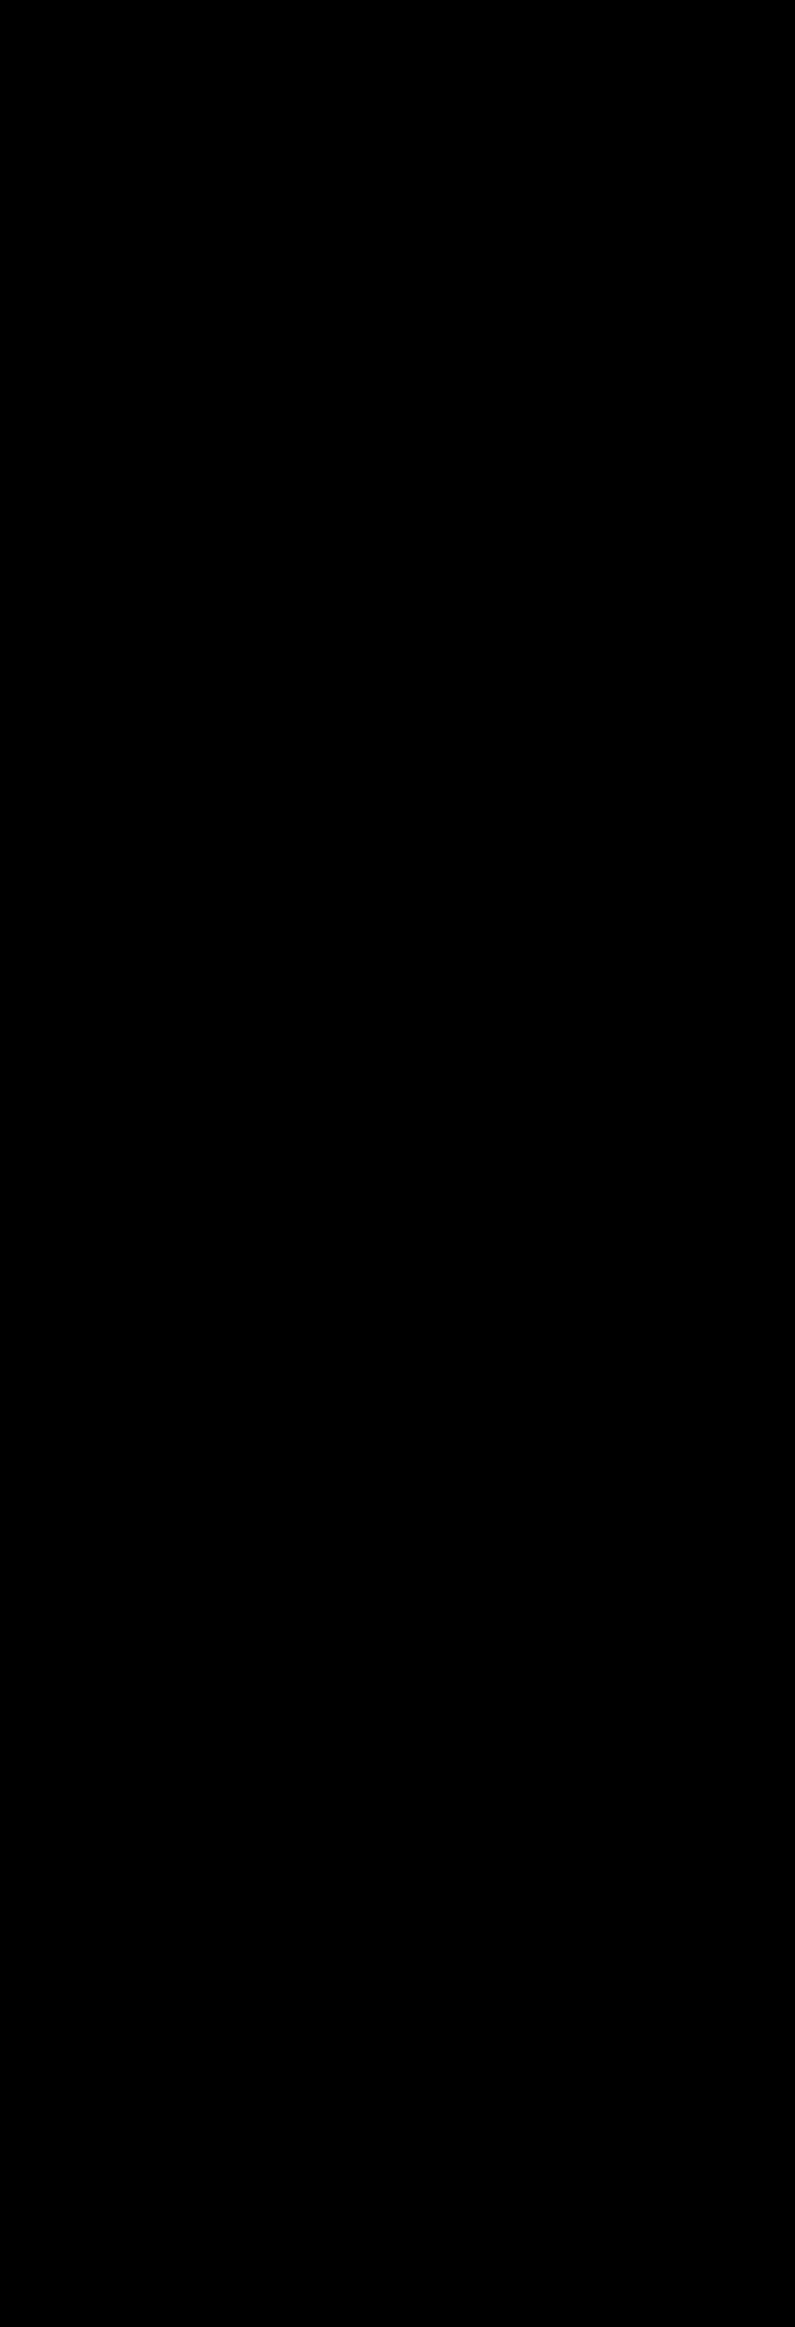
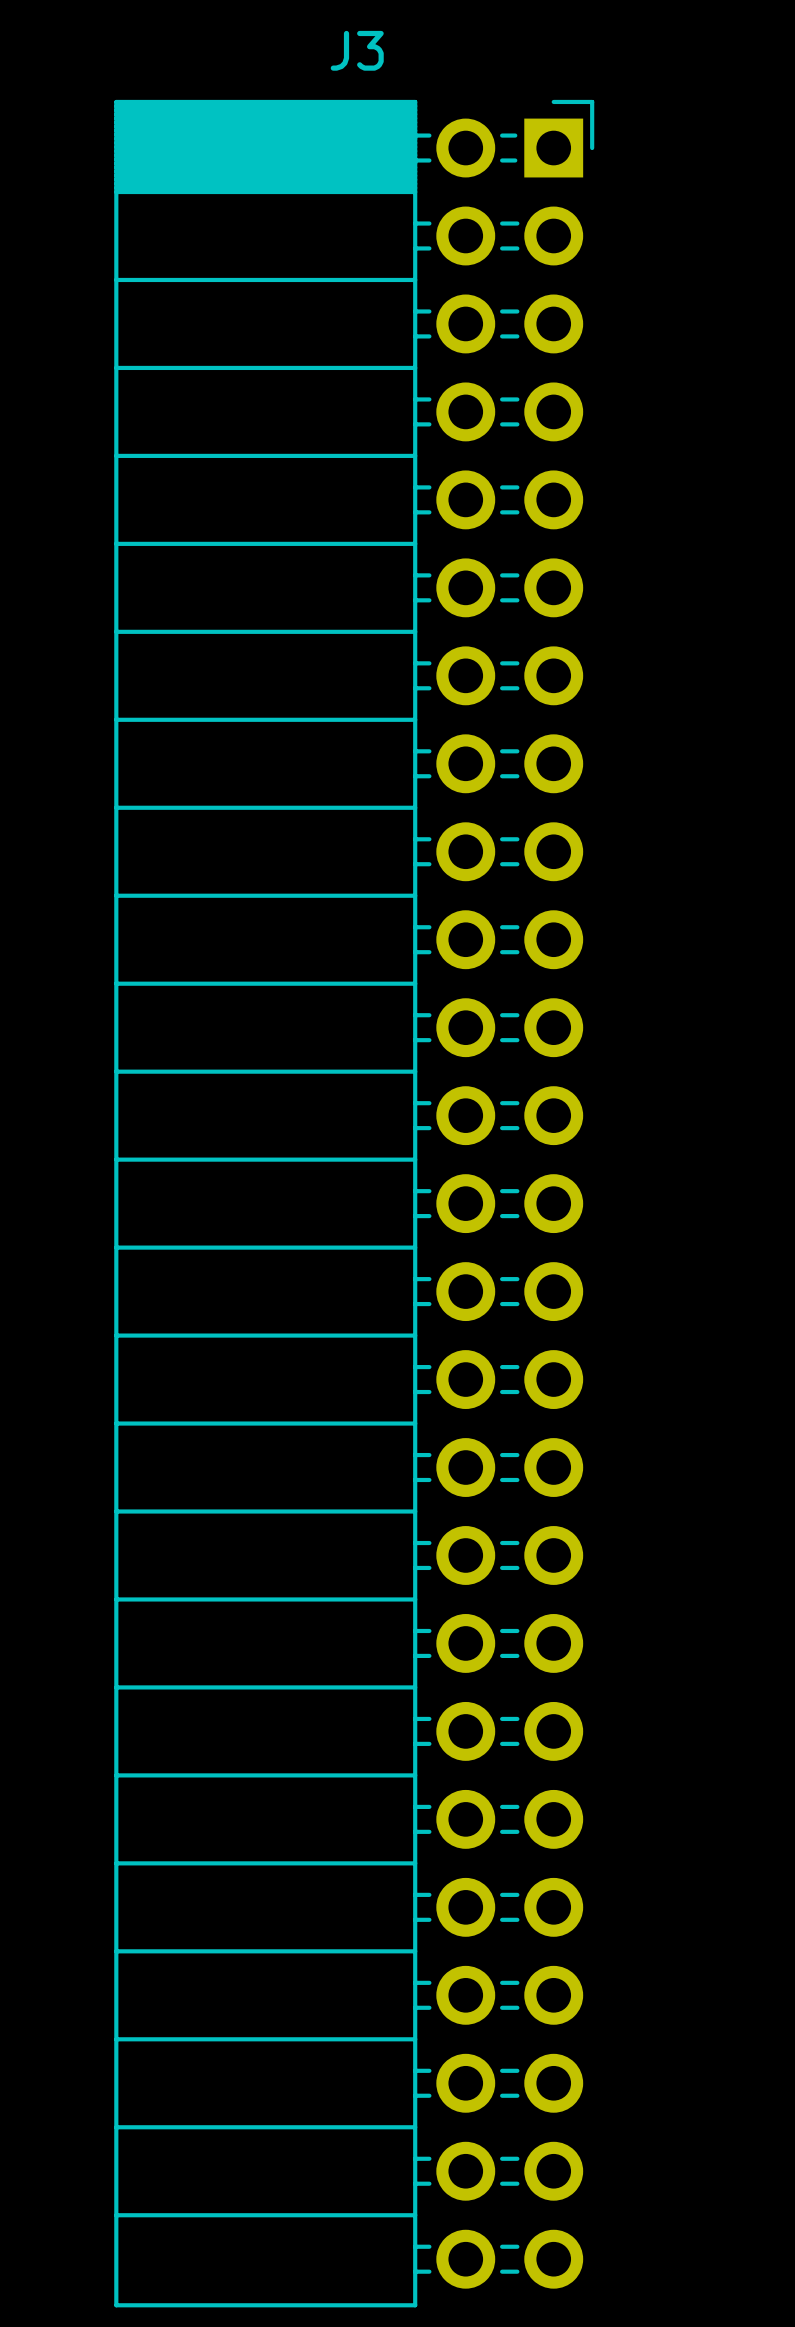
J3: none -> (354, 1203)

